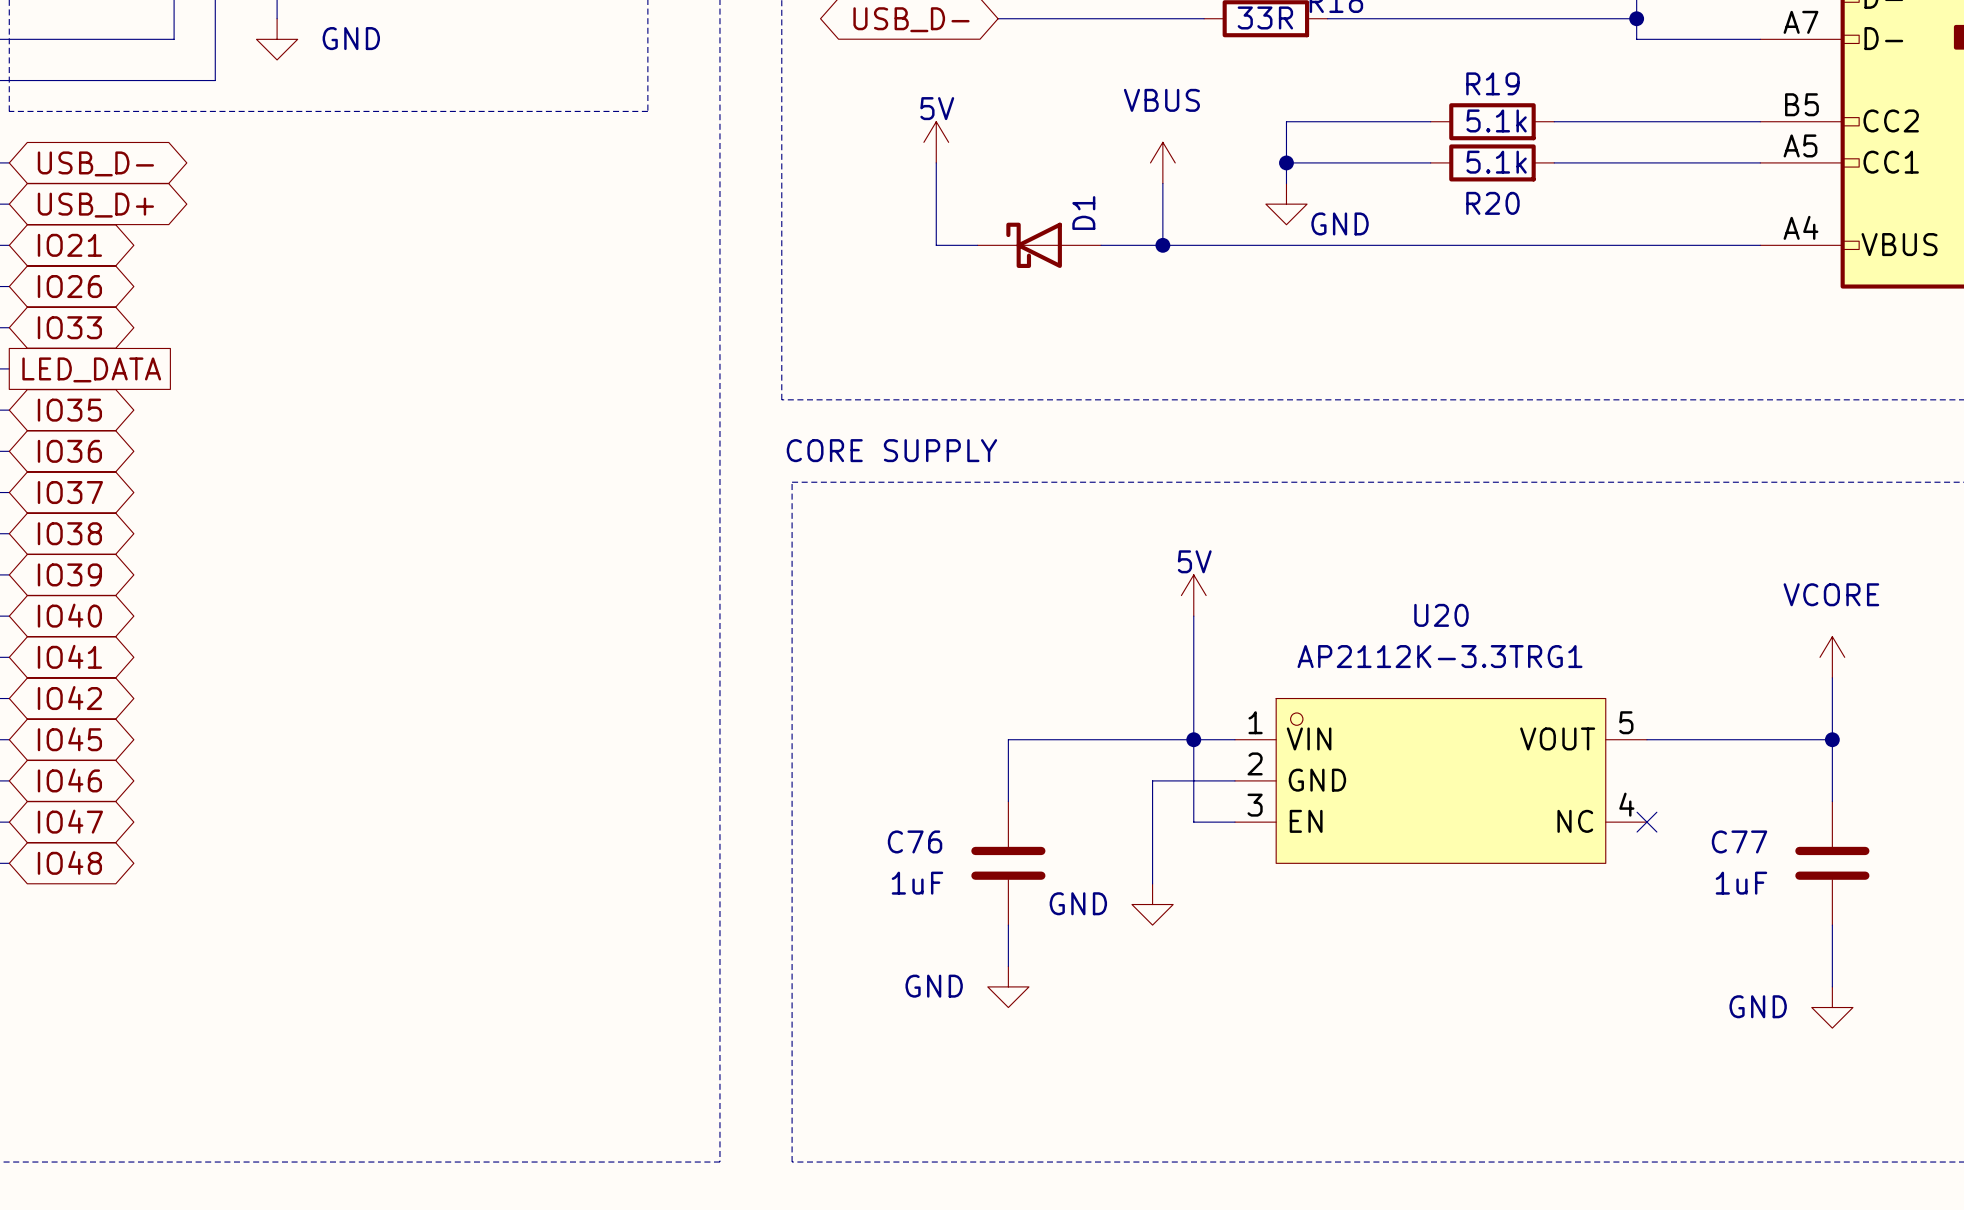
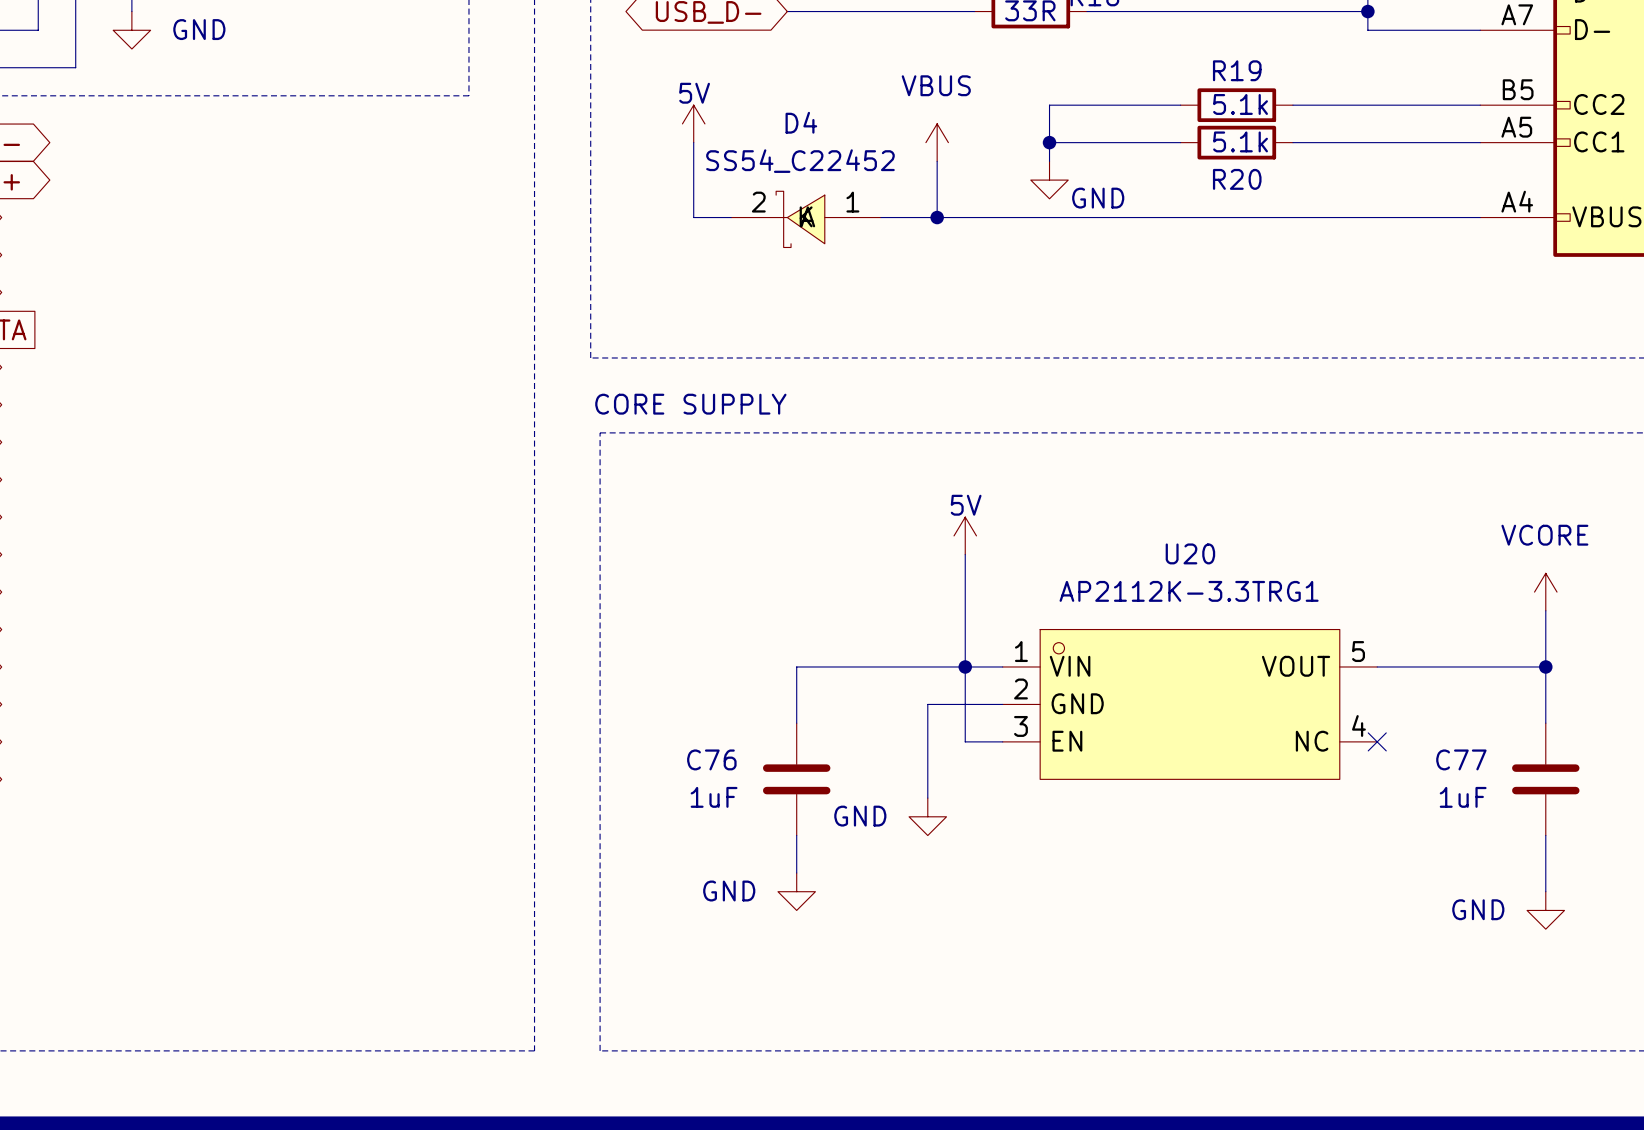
power symbol position: 5V (936, 142) -> 5V (693, 123)
wire: (936, 162) (936, 245) (977, 245) -> (693, 142) (693, 217) (731, 217)
D1: (1039, 245) -> none
D4: none -> SS54_C22452 (806, 219)

